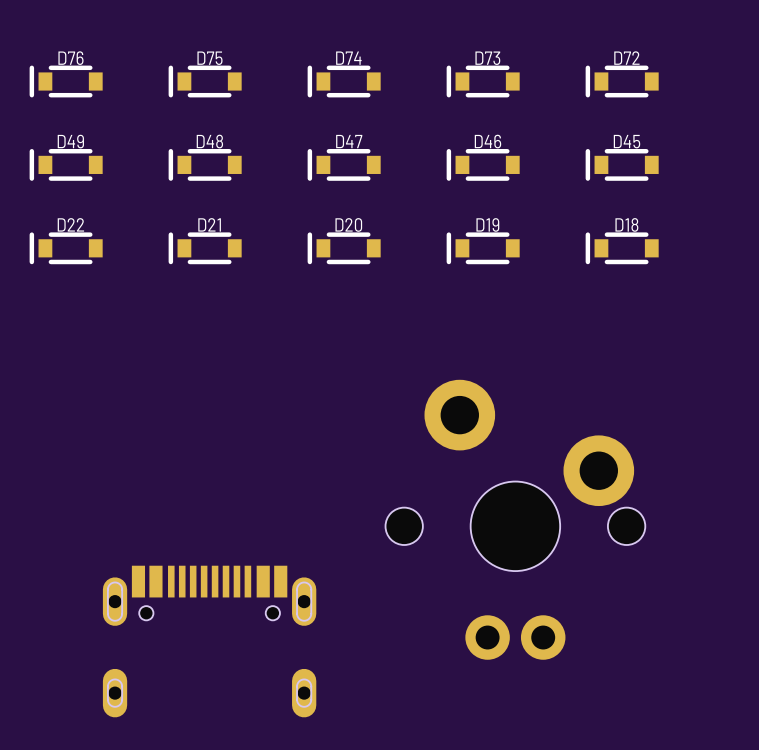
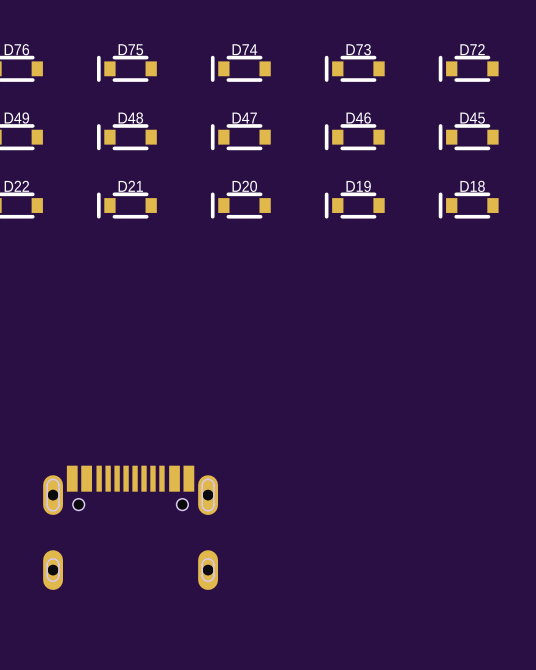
part: (515, 519) -> none

